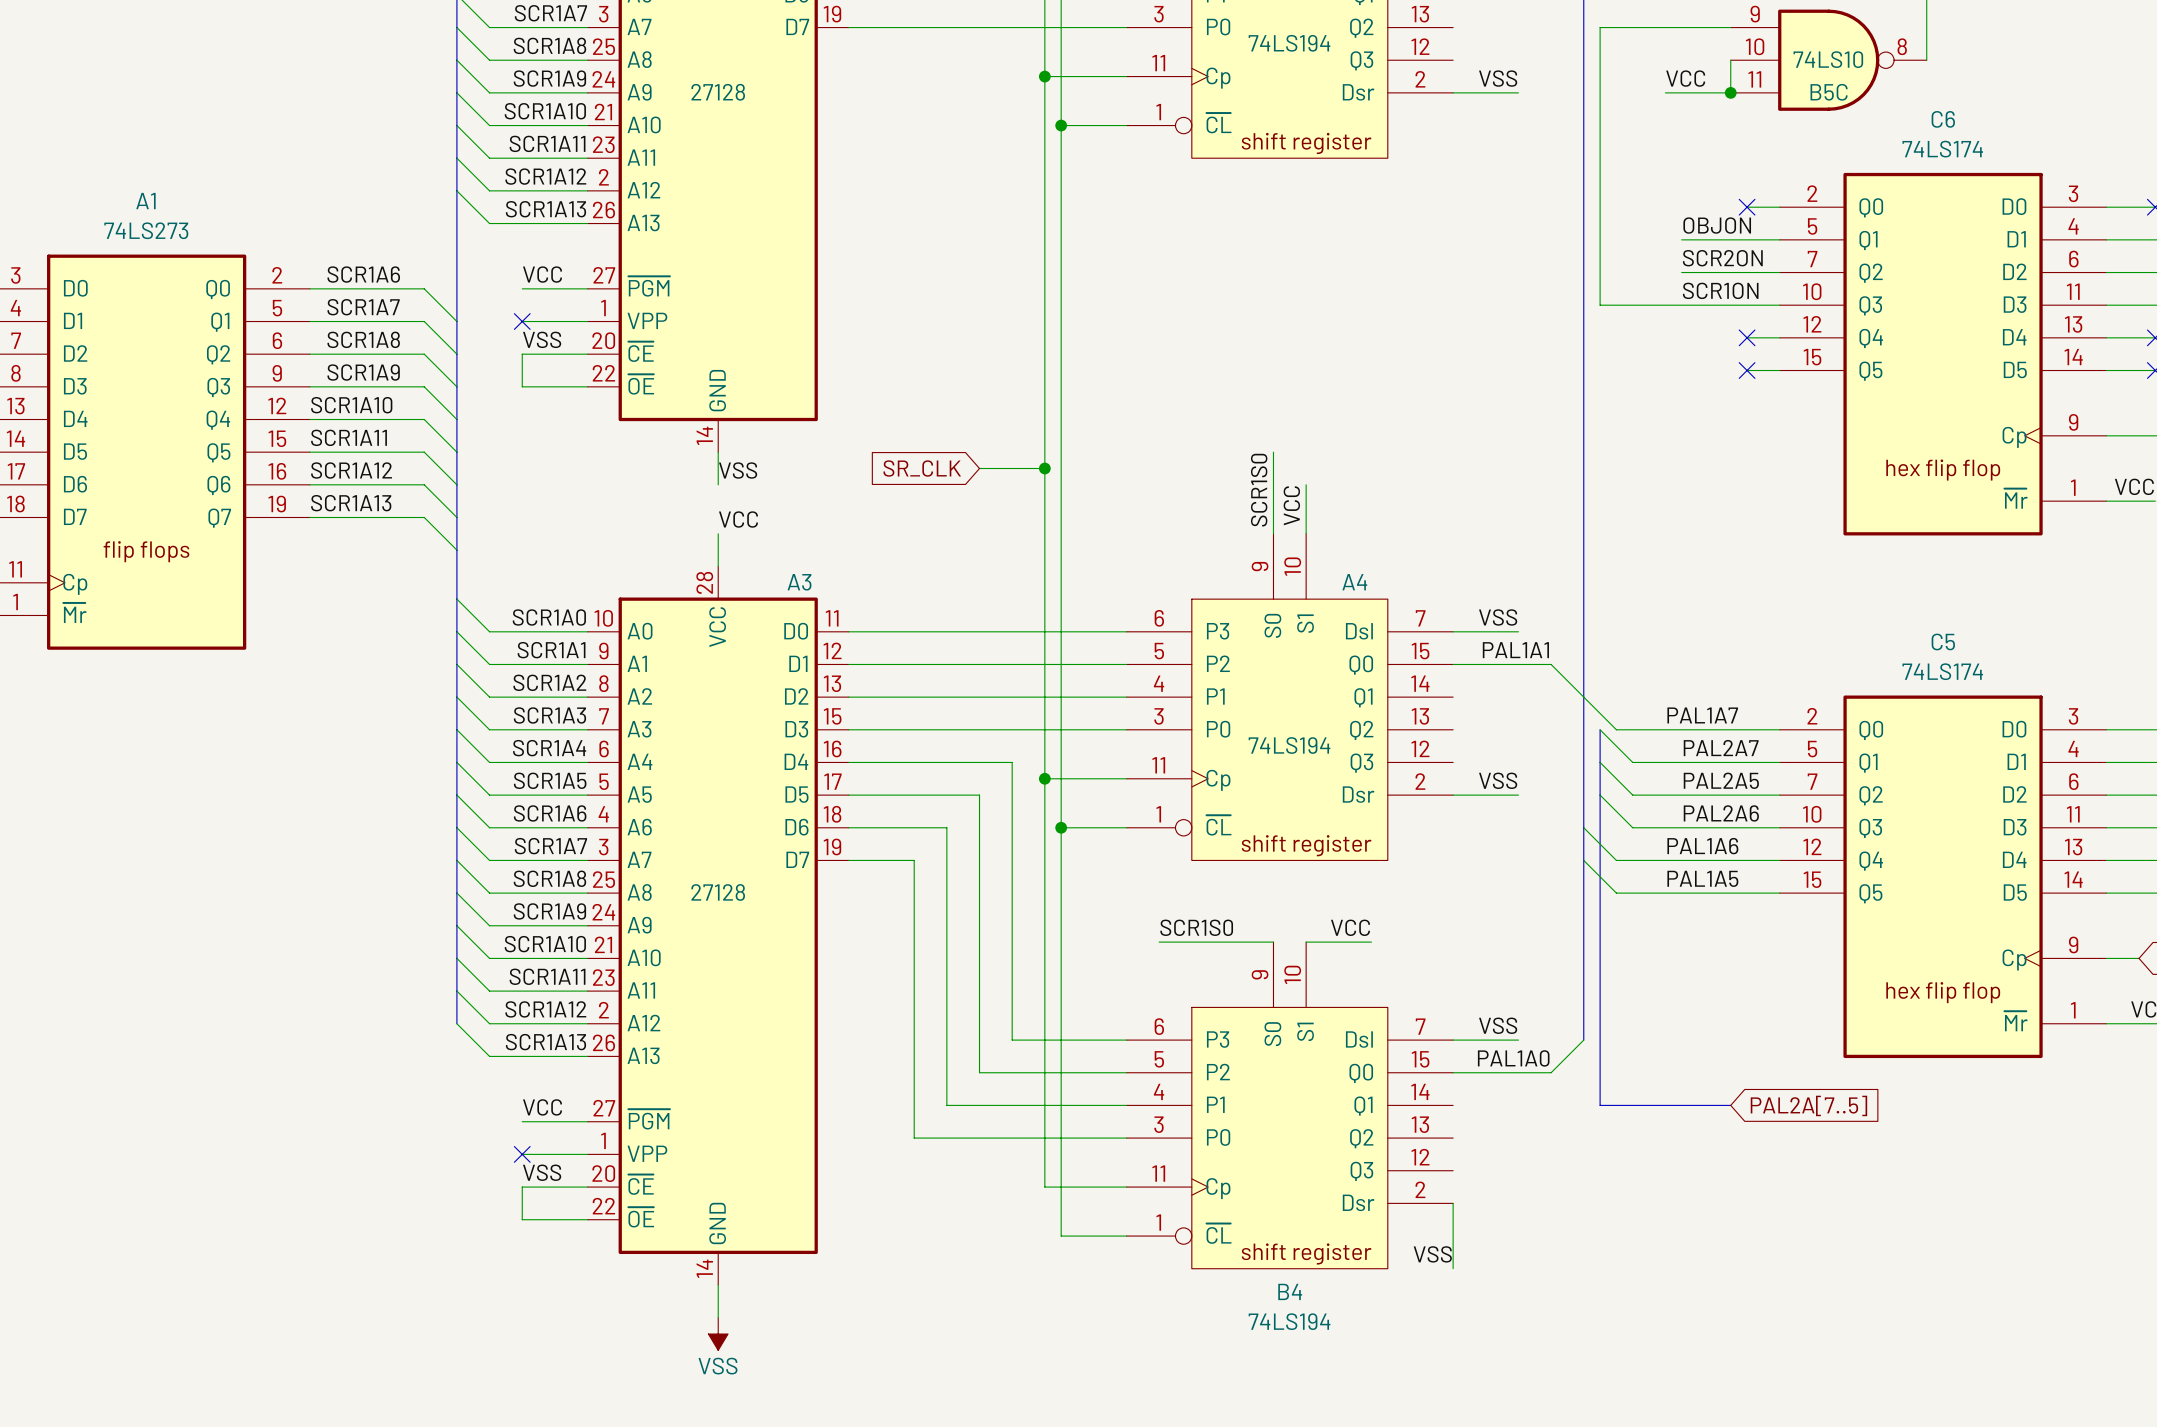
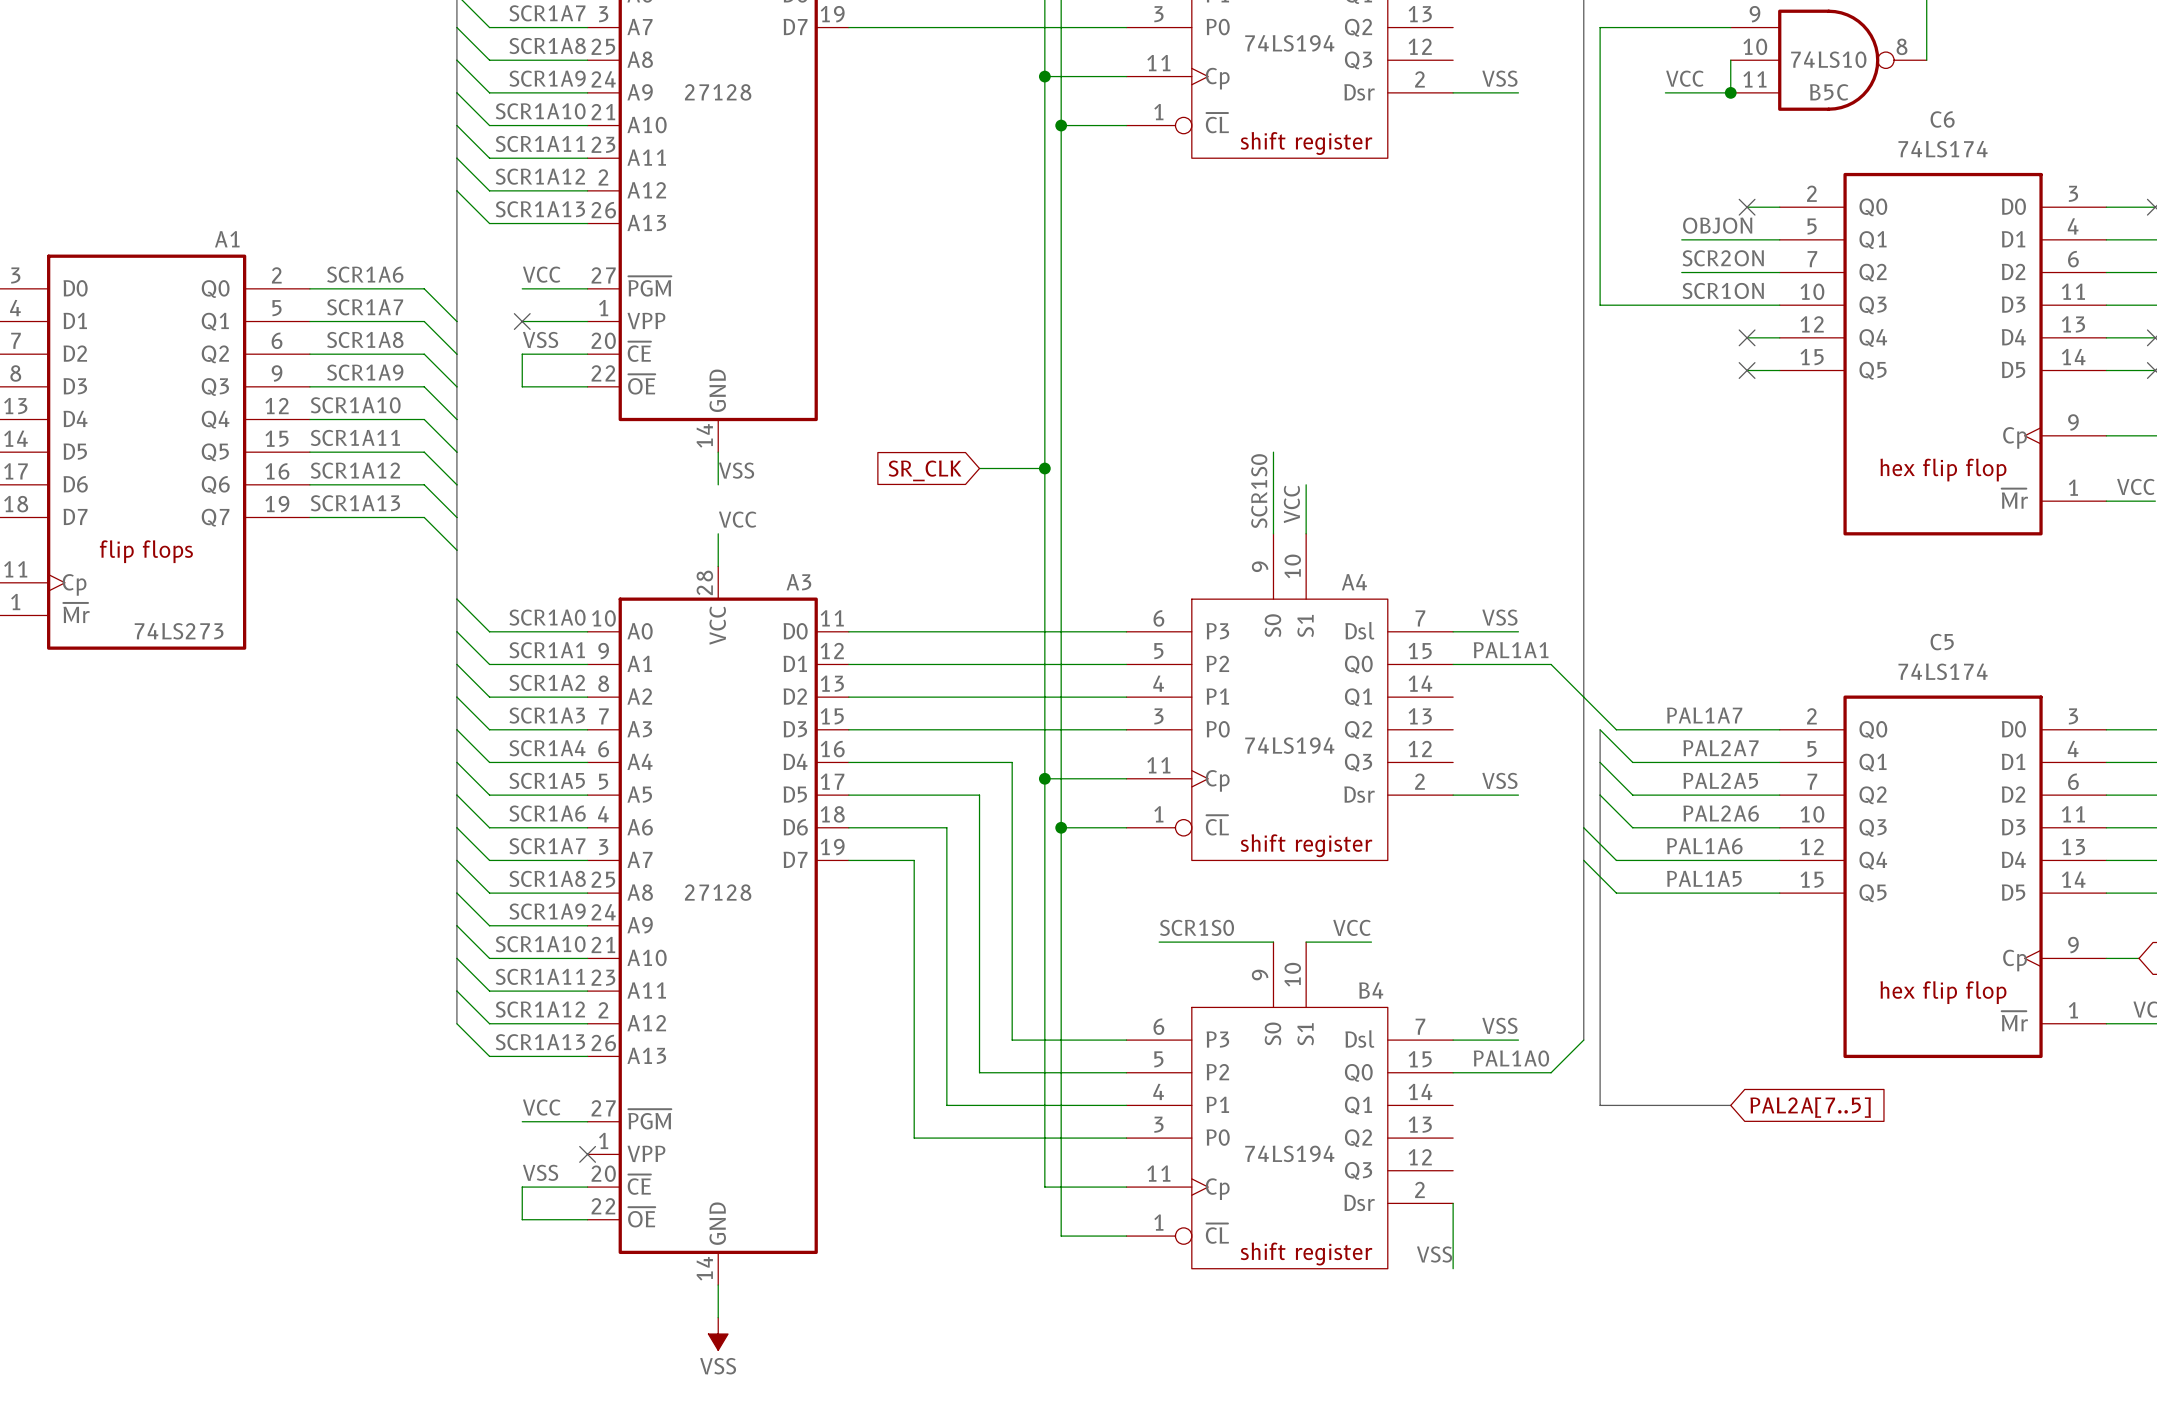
A1 name position: A1 (145, 201) -> A1 (227, 239)
A1 value position: 74LS273 (146, 230) -> 74LS273 (179, 631)
wire: (522, 1154) (587, 1154) -> none
no-connect mark position: (522, 1154) -> (587, 1154)
B4 name position: B4 (1290, 1291) -> B4 (1371, 990)
B4 value position: 74LS194 (1289, 1321) -> 74LS194 (1289, 1153)

